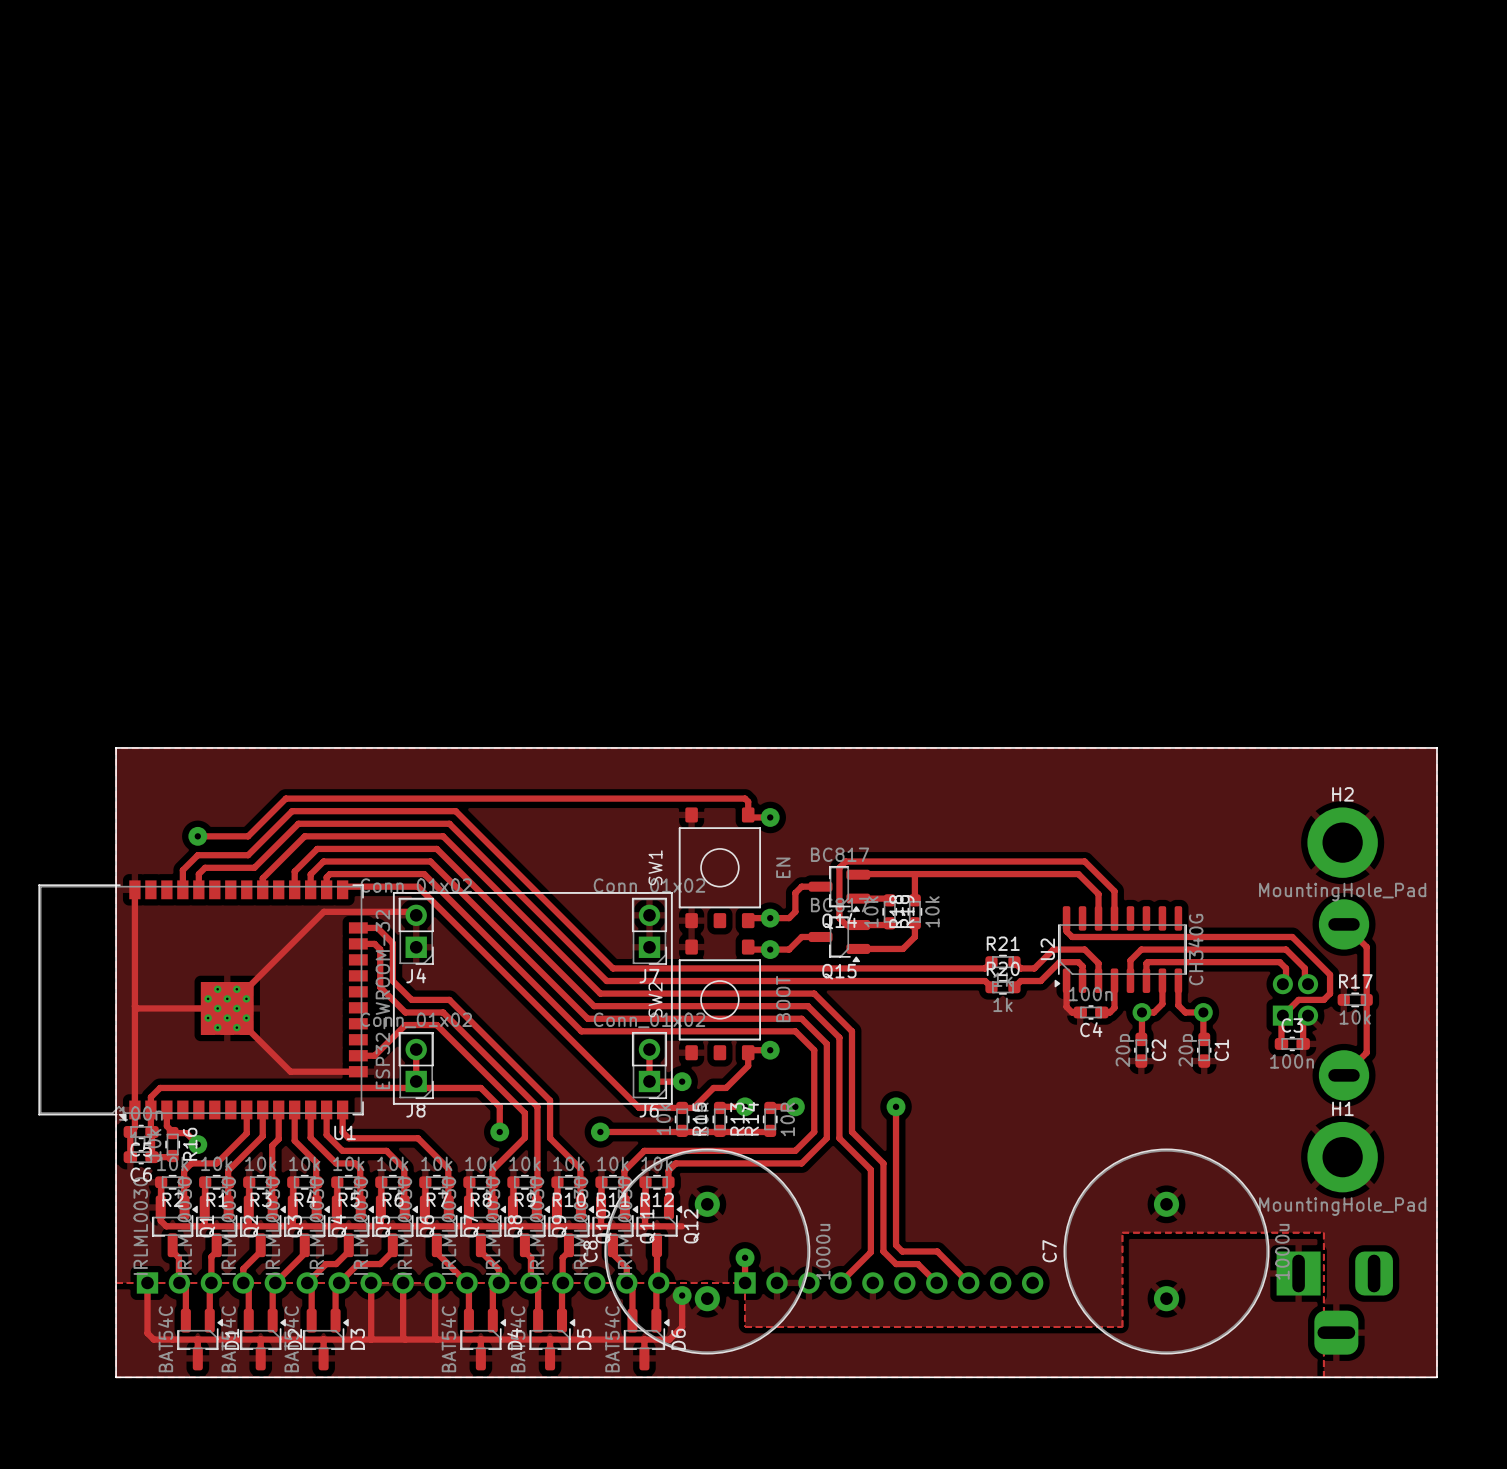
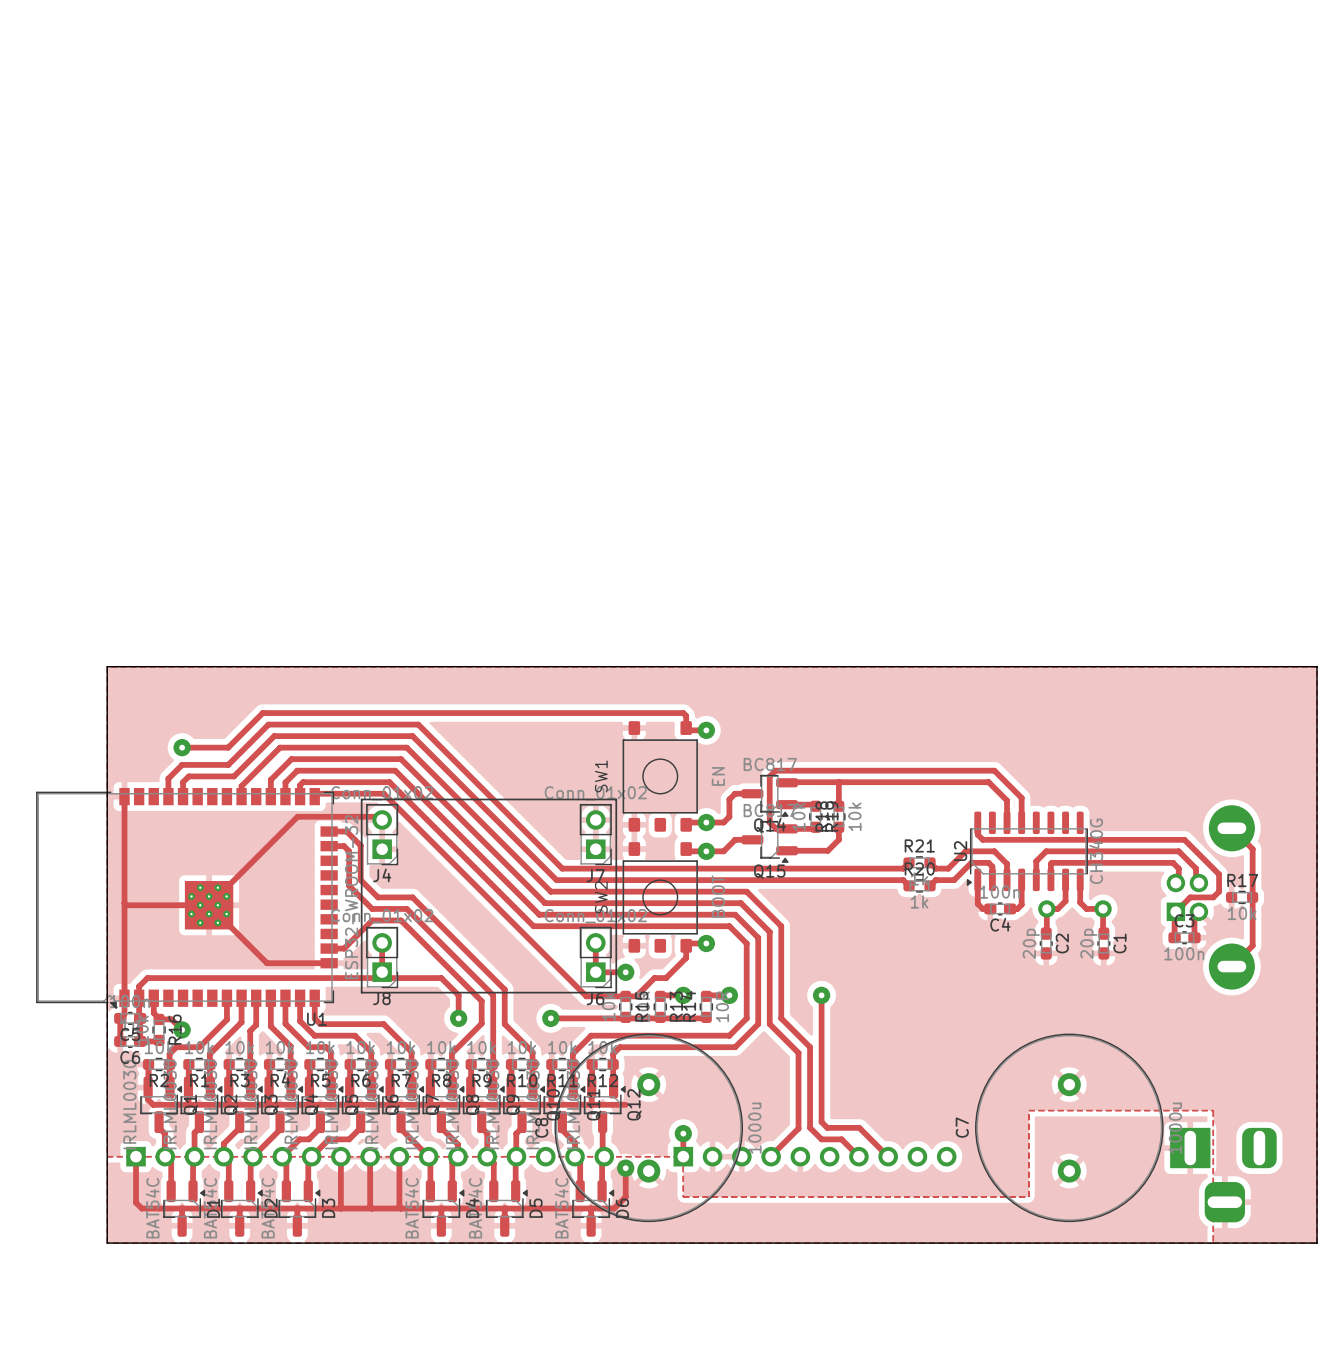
H2: MountingHole_Pad (1342, 842) -> none
H1: MountingHole_Pad (1342, 1157) -> none

